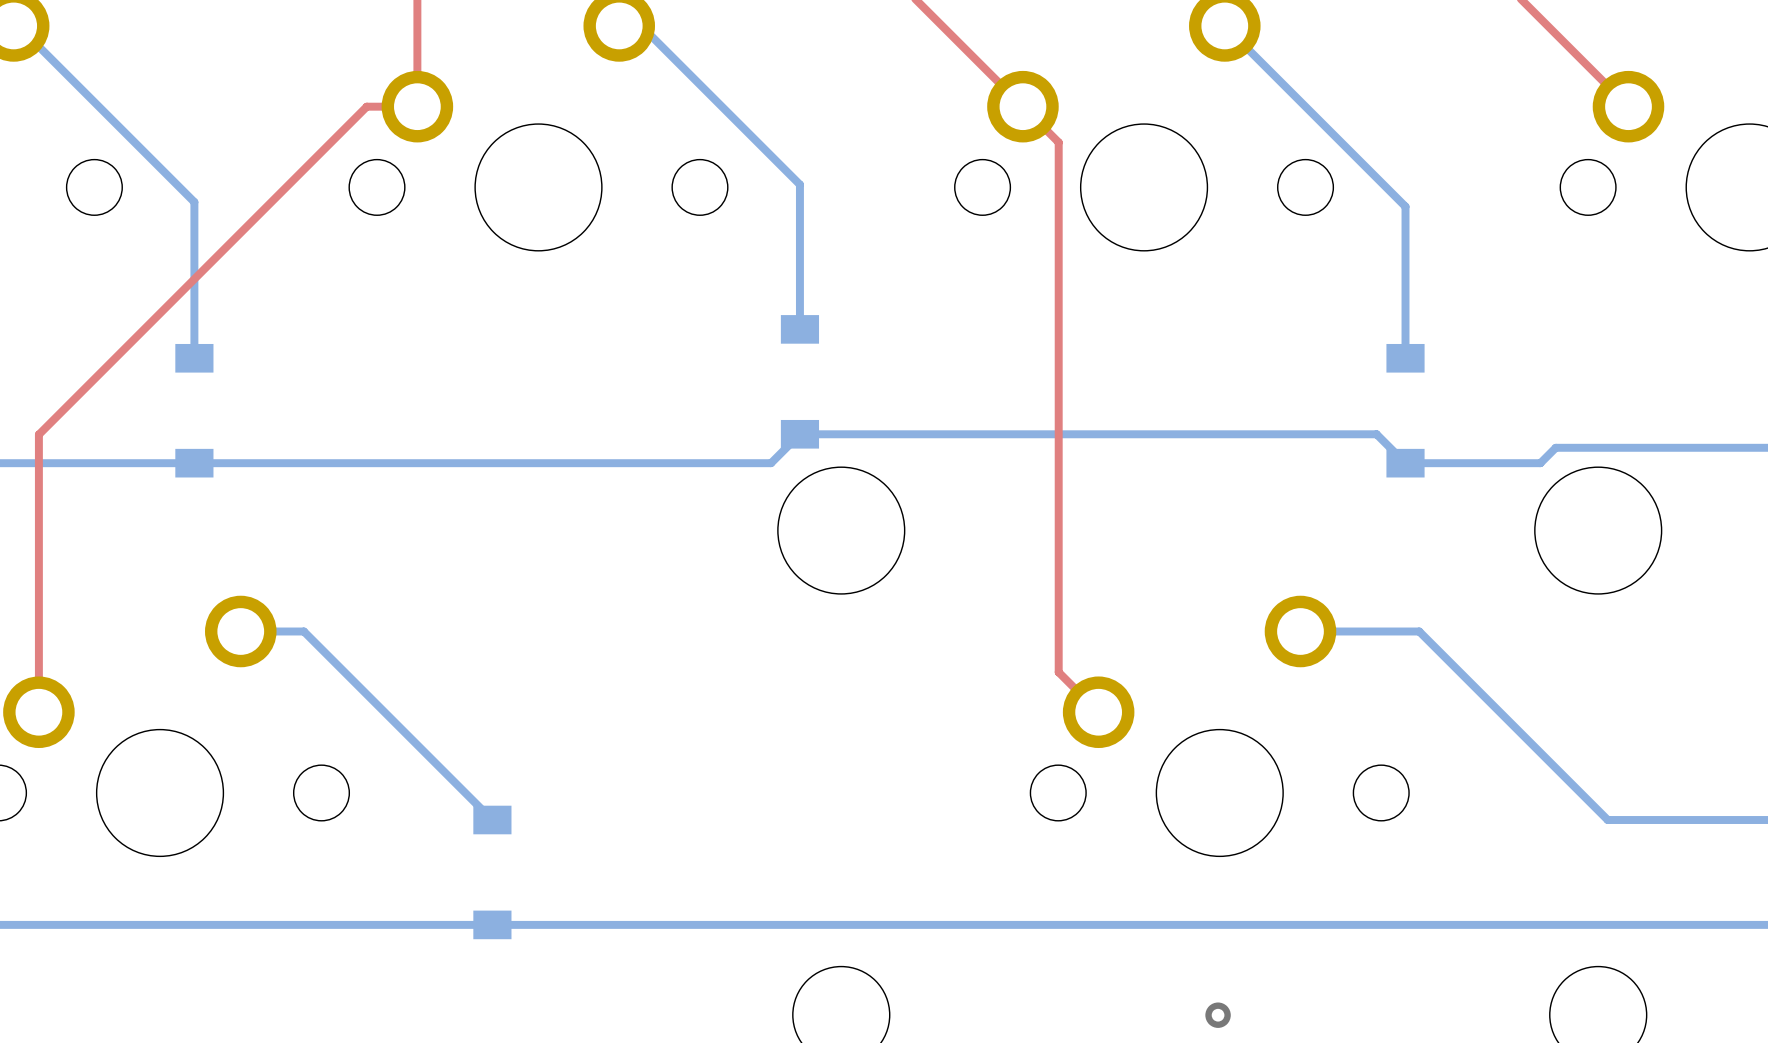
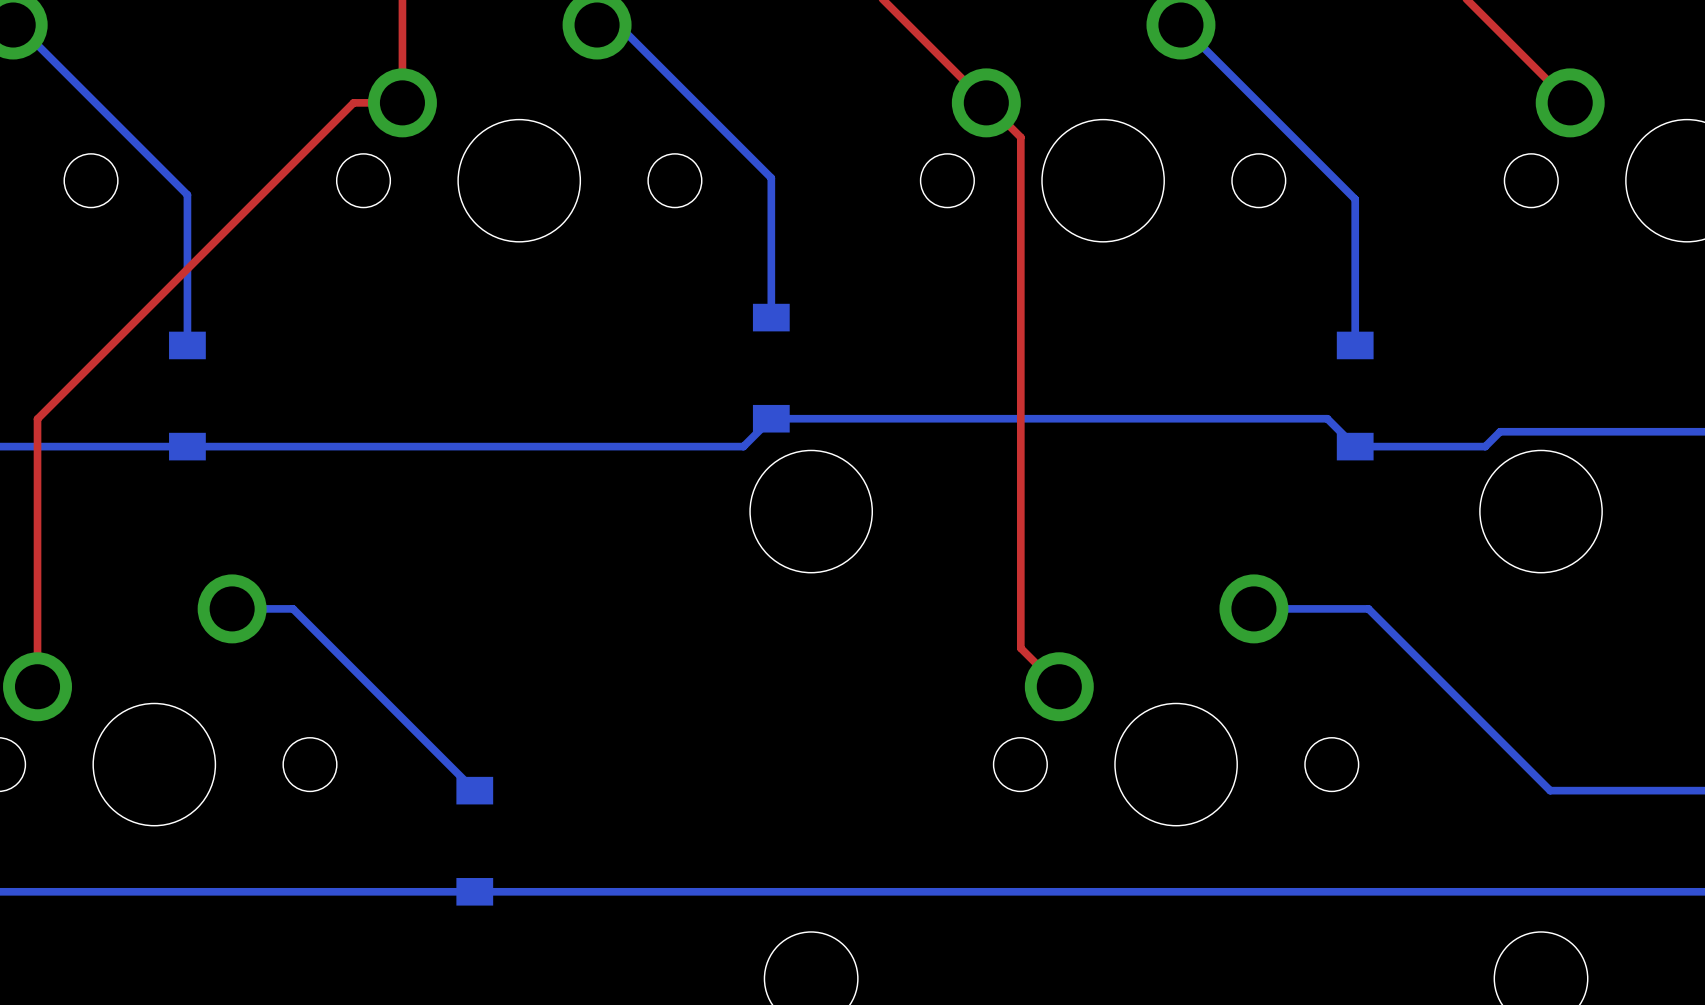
via: (1218, 1015) -> none

